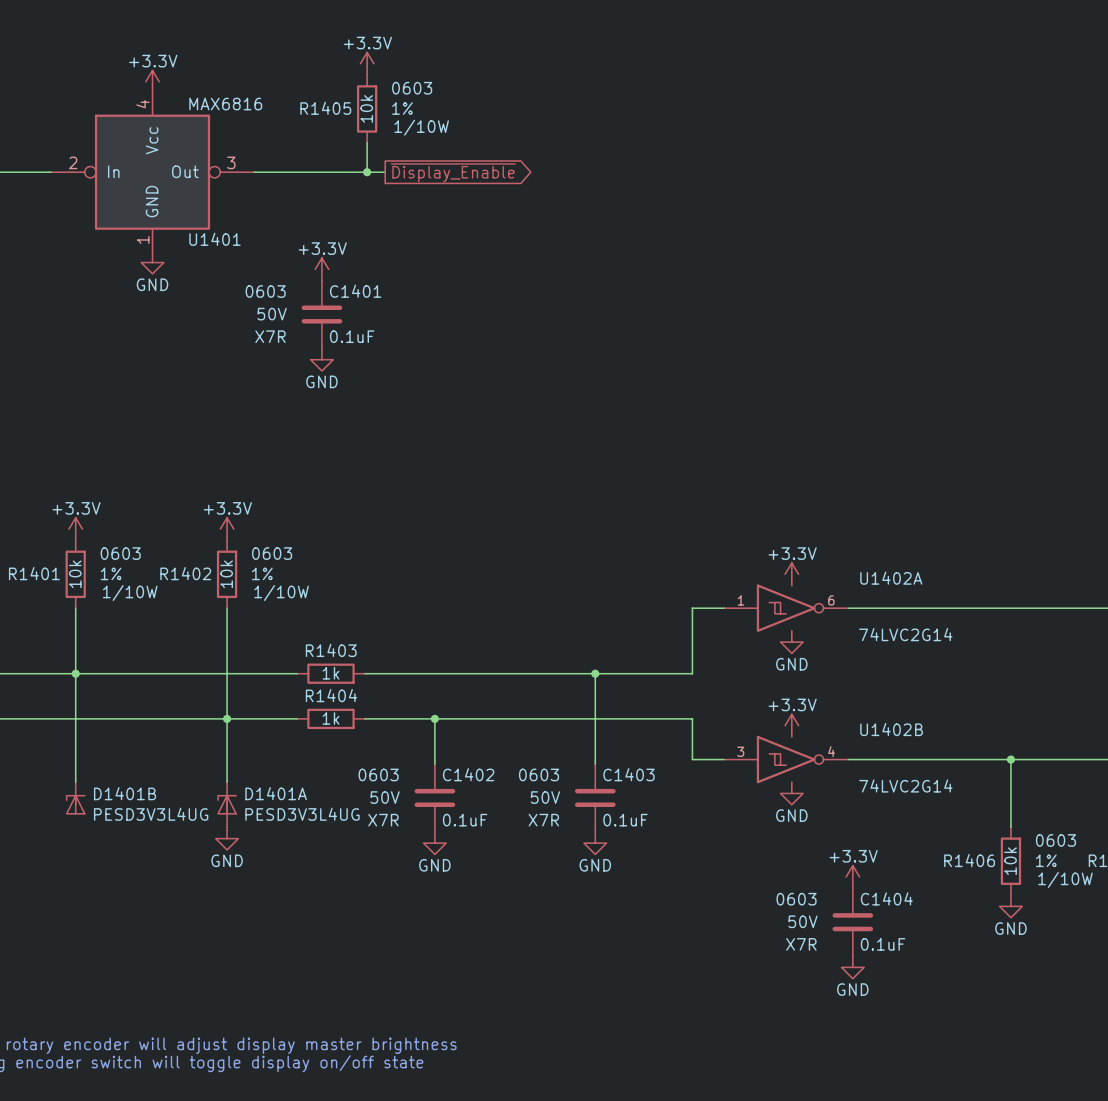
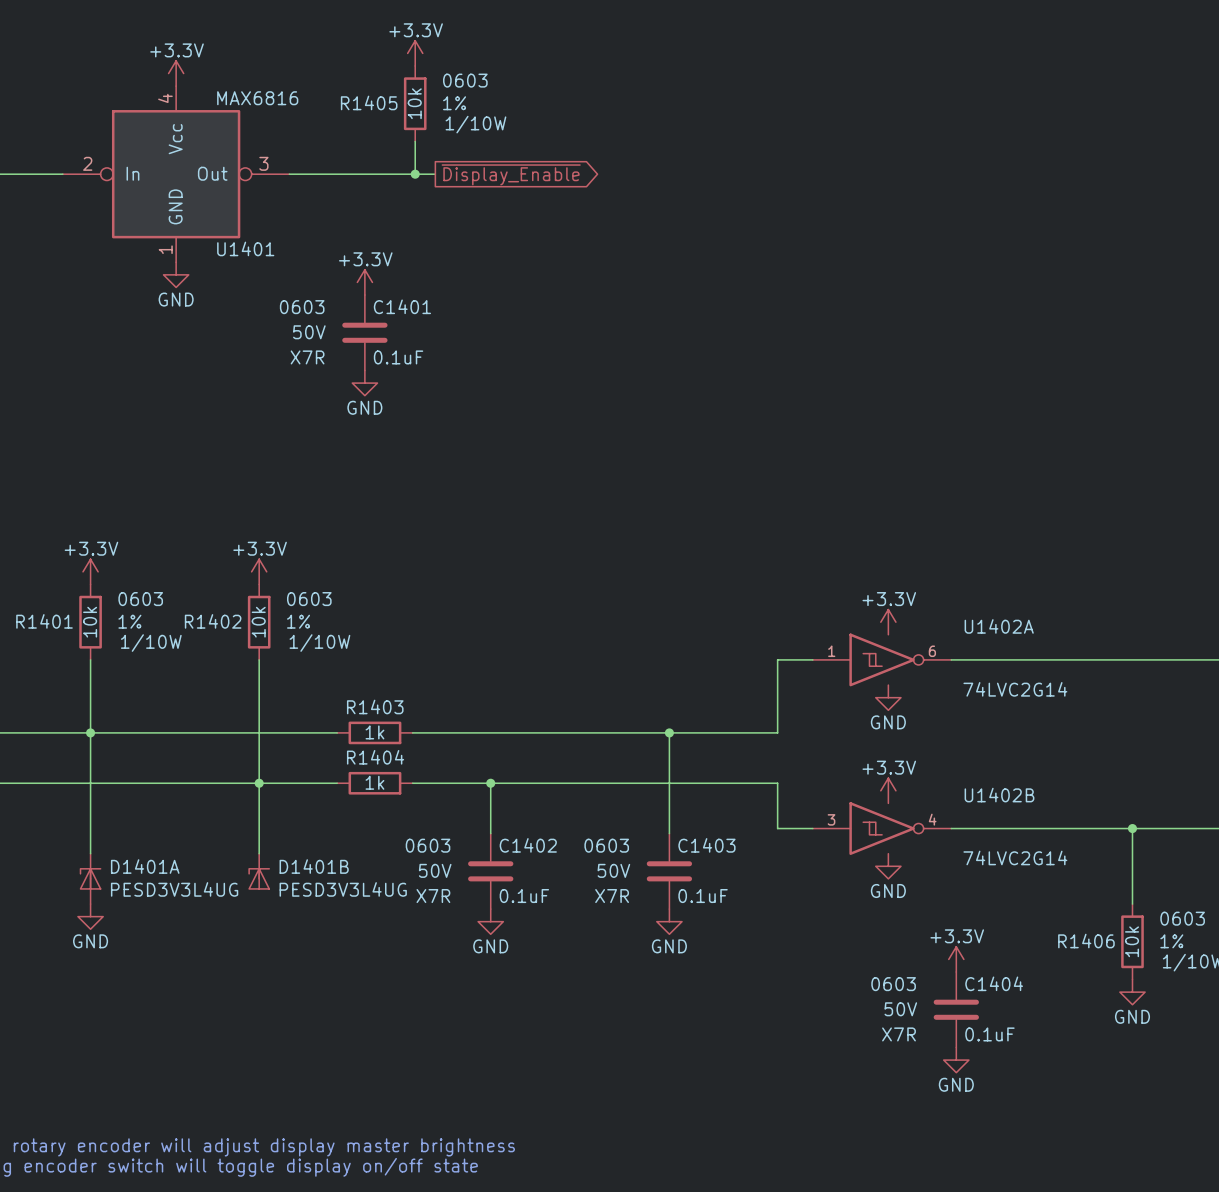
D1401B position: (75, 797) -> (259, 871)
D1401A position: (227, 804) -> (90, 878)
power symbol position: GND (227, 838) -> GND (90, 916)

